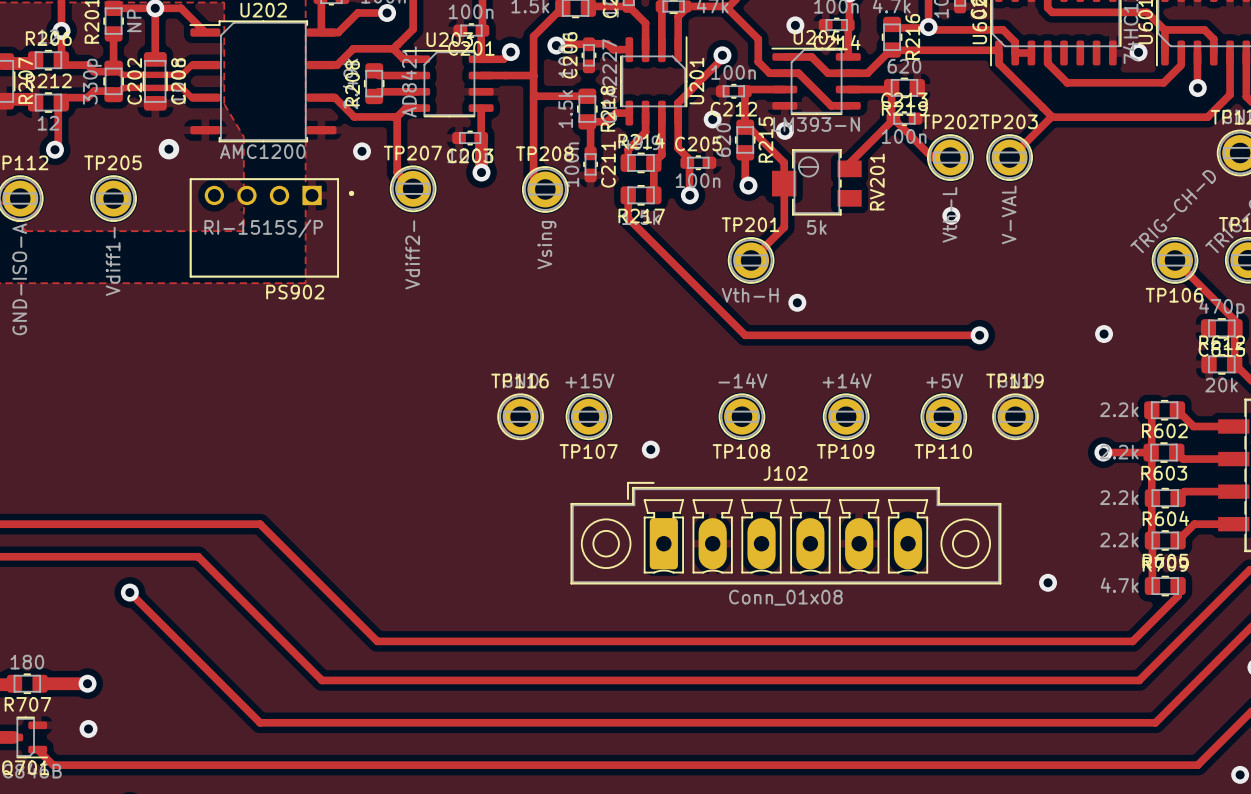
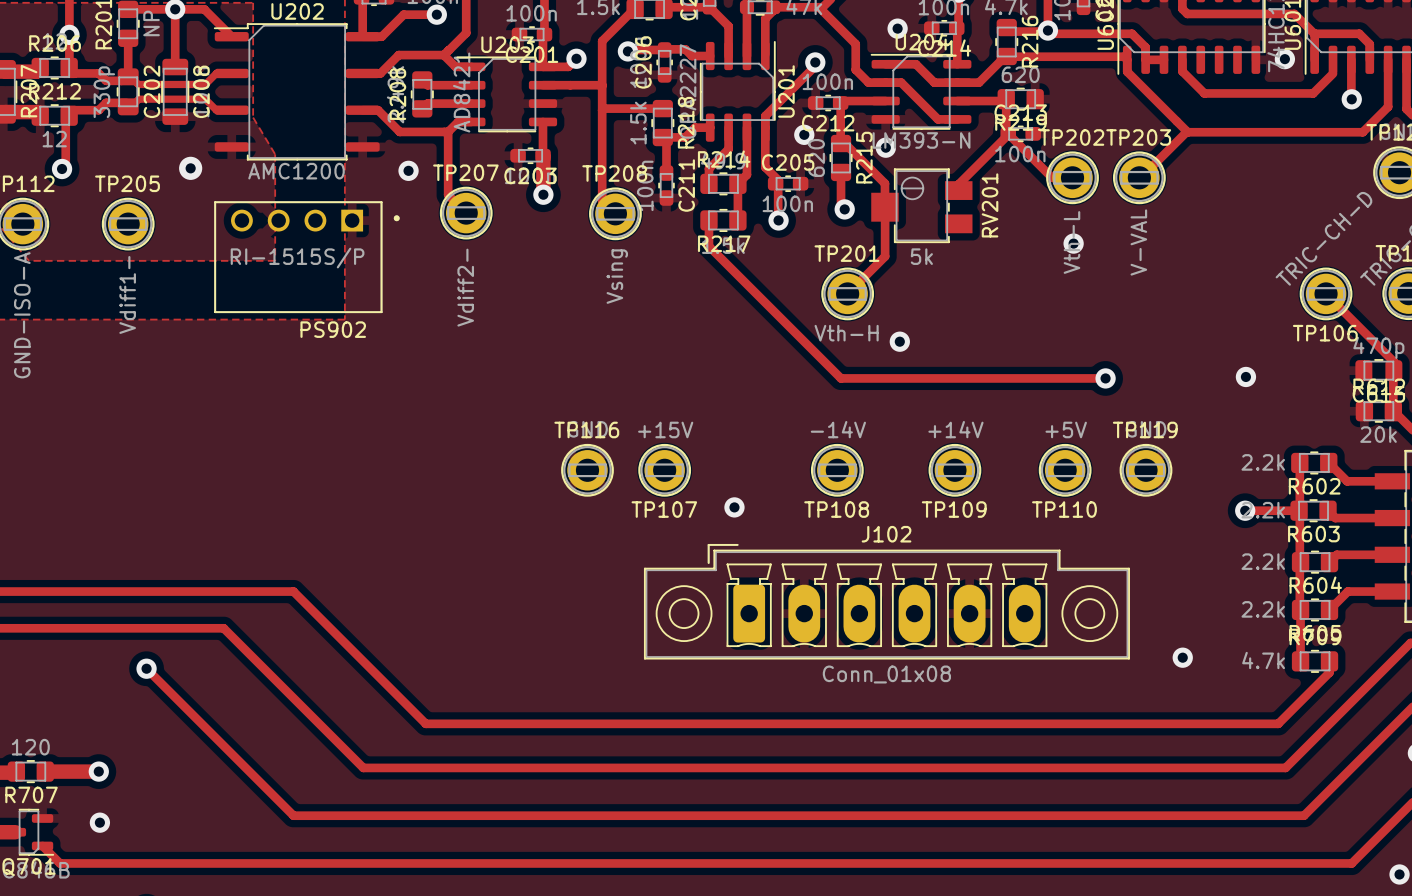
TP106 value: TRIG-CH-D (1173, 211) -> TRIC-CH-D (1323, 238)
R707 value: 180 (27, 662) -> 120 (30, 747)

